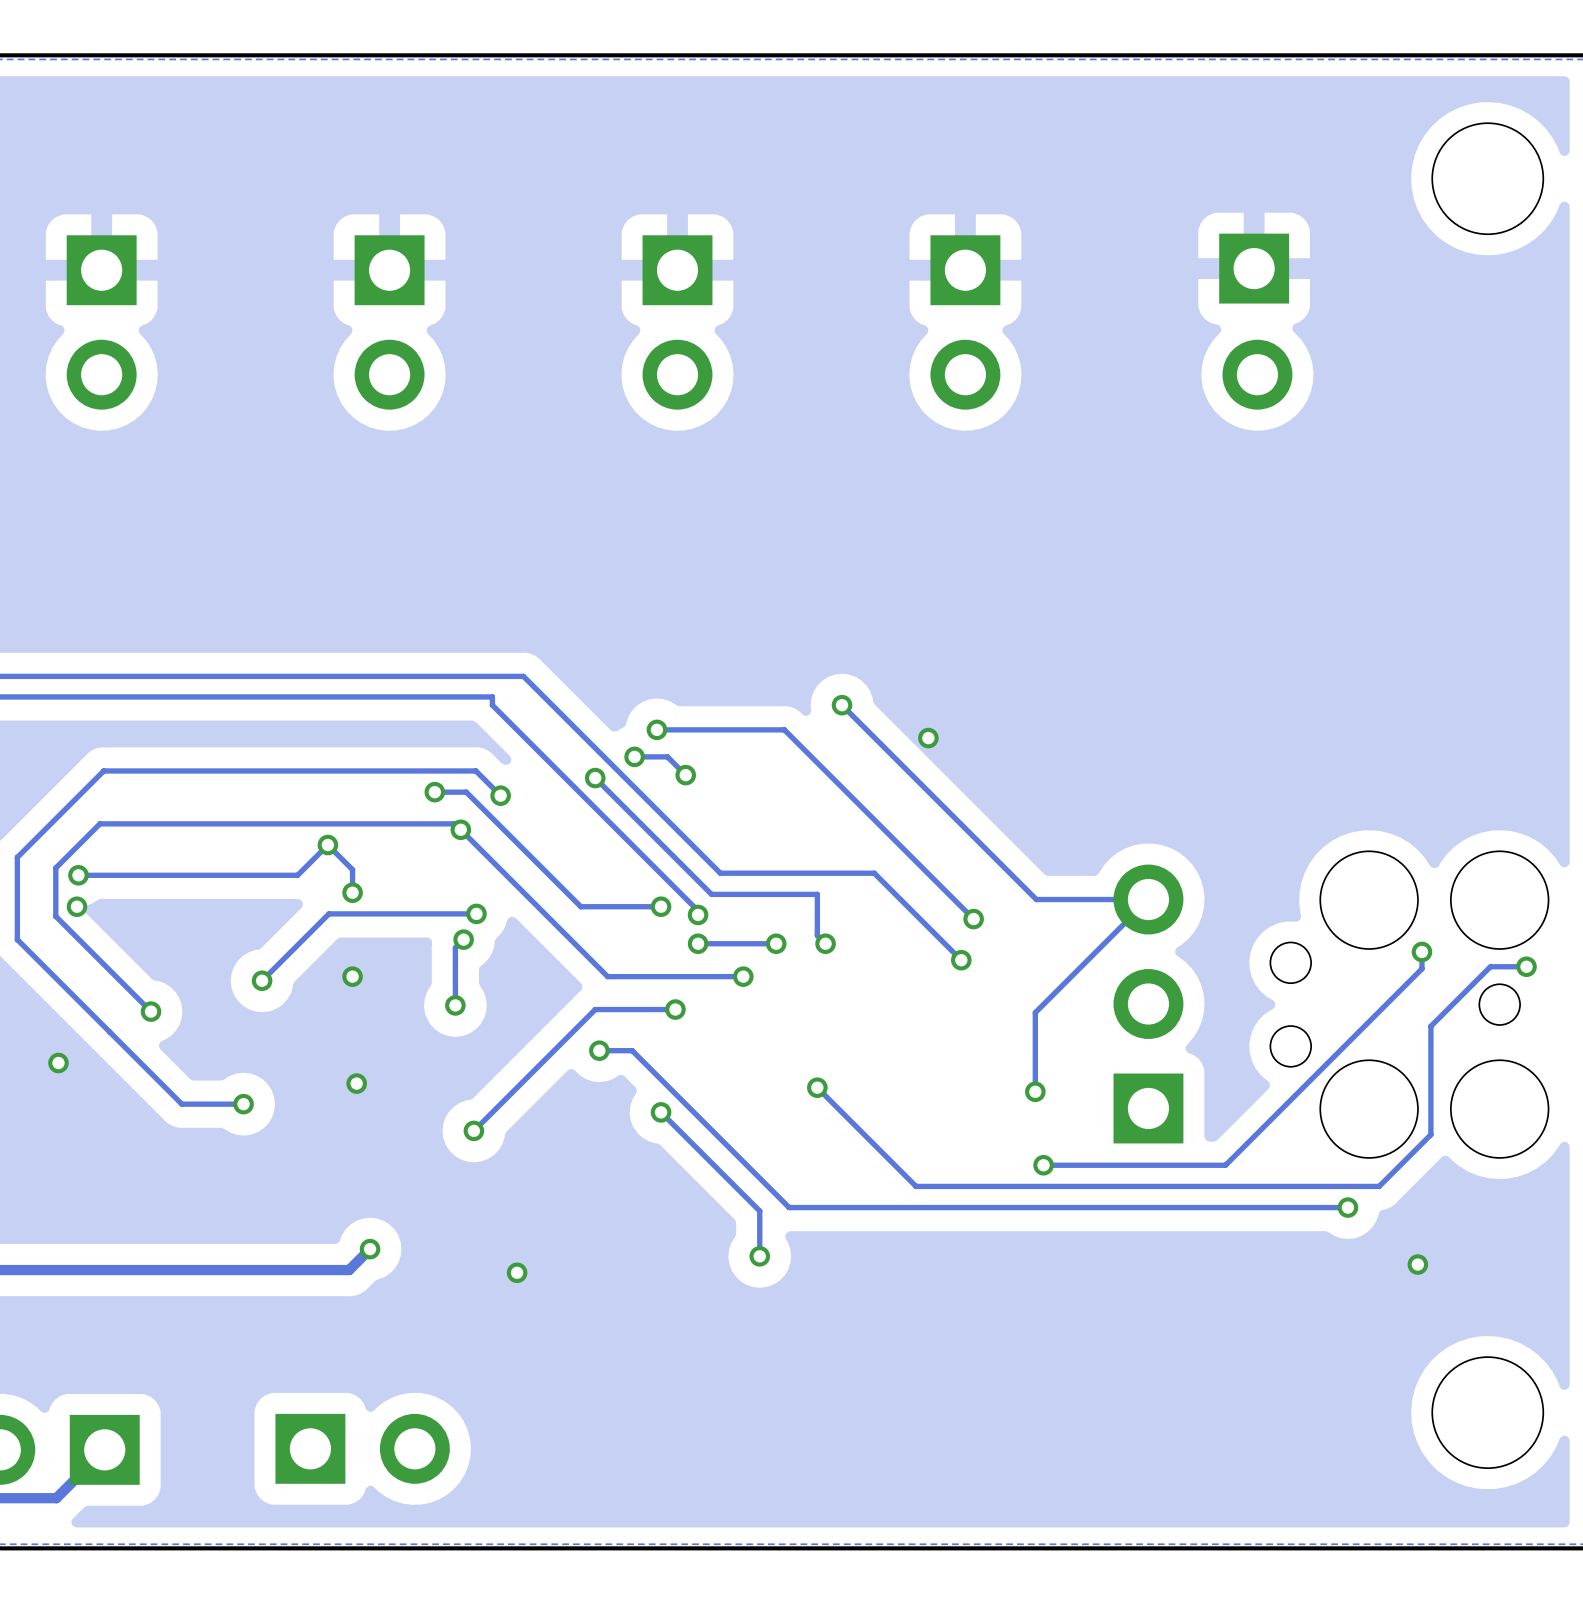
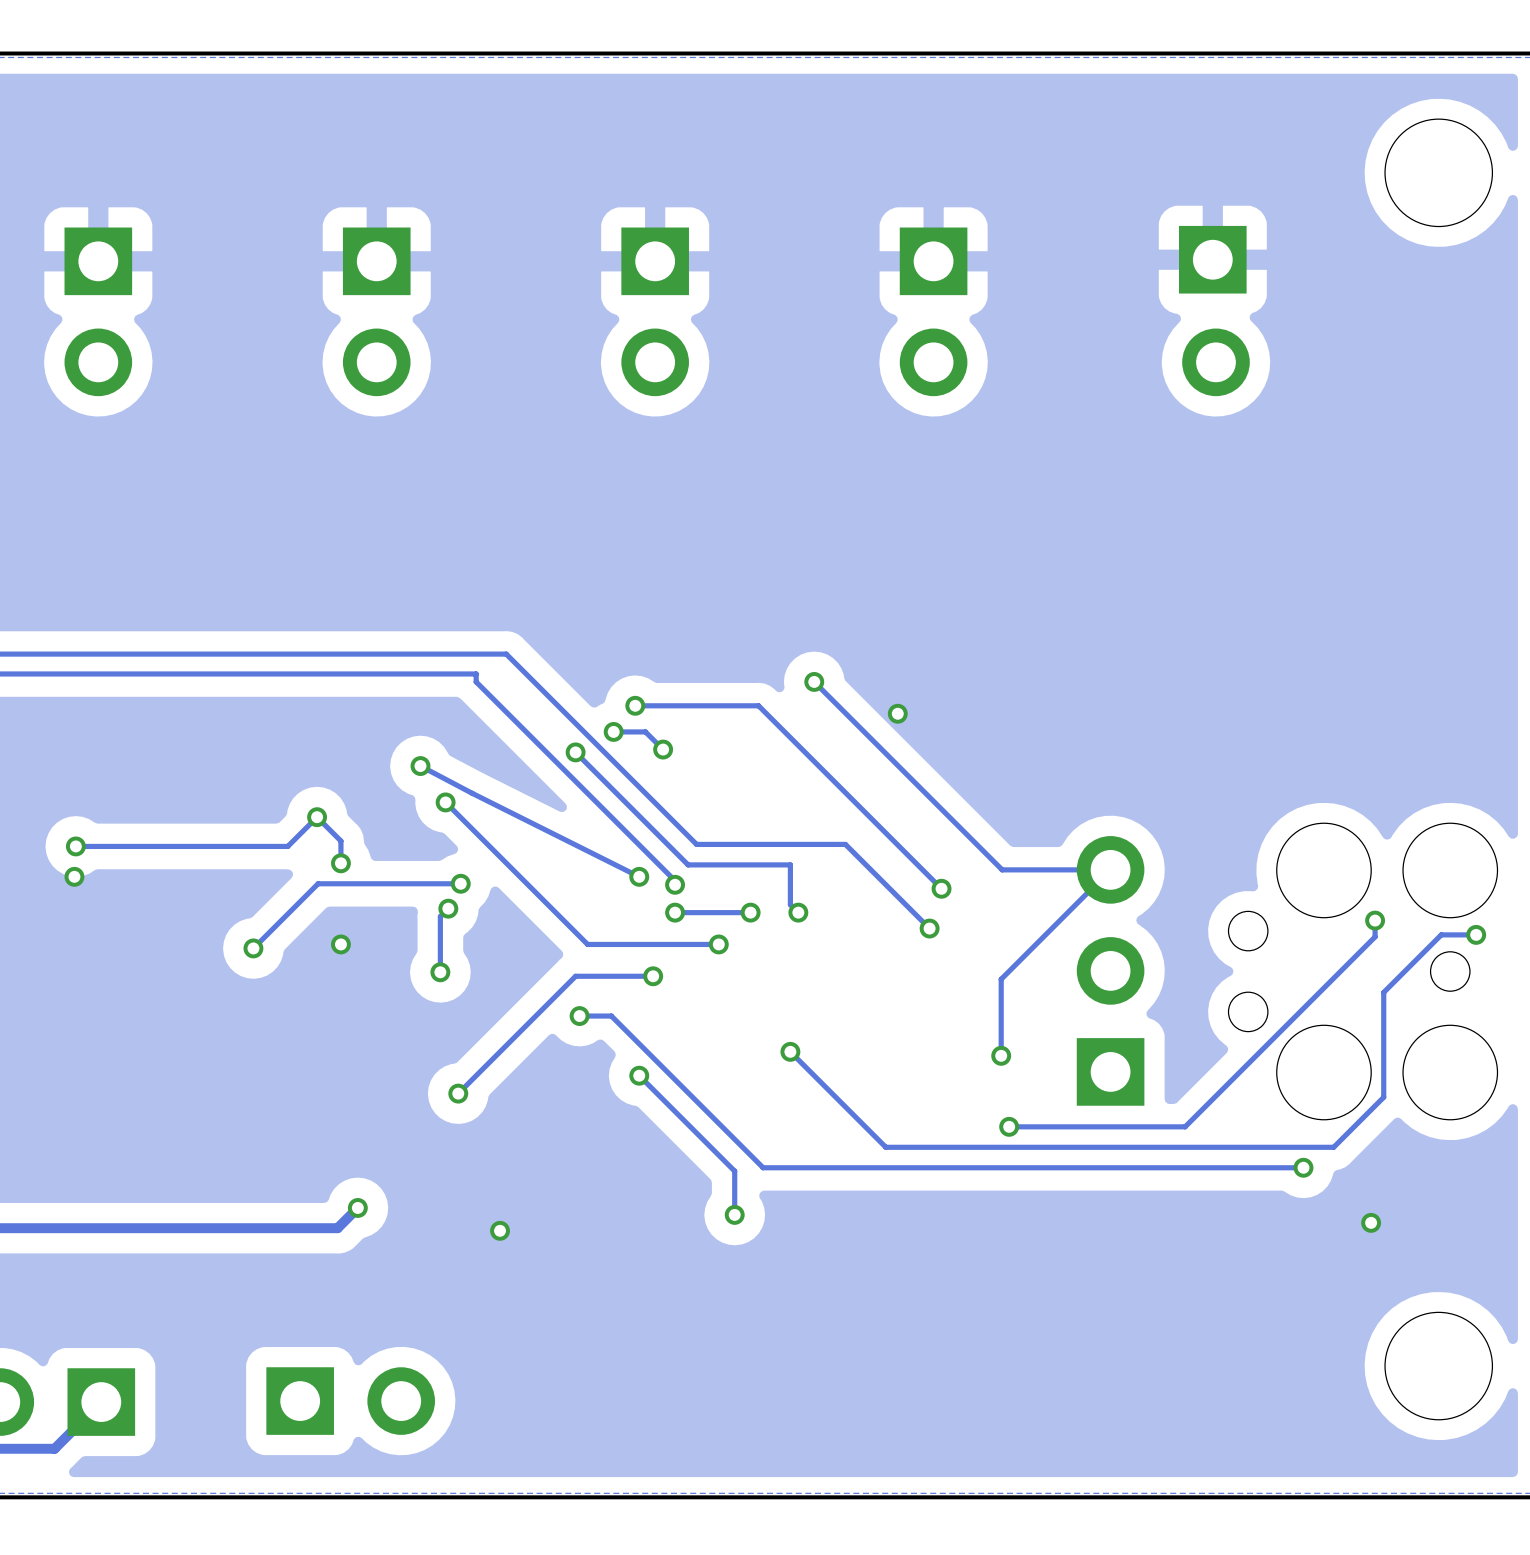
track: (434, 792) (466, 792) (580, 906) (661, 906) -> (420, 766) (639, 876)
track: (500, 795) (475, 770) (103, 770) (17, 857) (17, 939) (181, 1104) (243, 1104) -> none
via: (500, 795) -> none
track: (460, 829) (454, 823) (99, 823) (55, 868) (55, 916) (151, 1011) -> none
via: (151, 1011) -> none
via: (58, 1063) -> none
via: (356, 1083) -> none
via: (243, 1104) -> none

